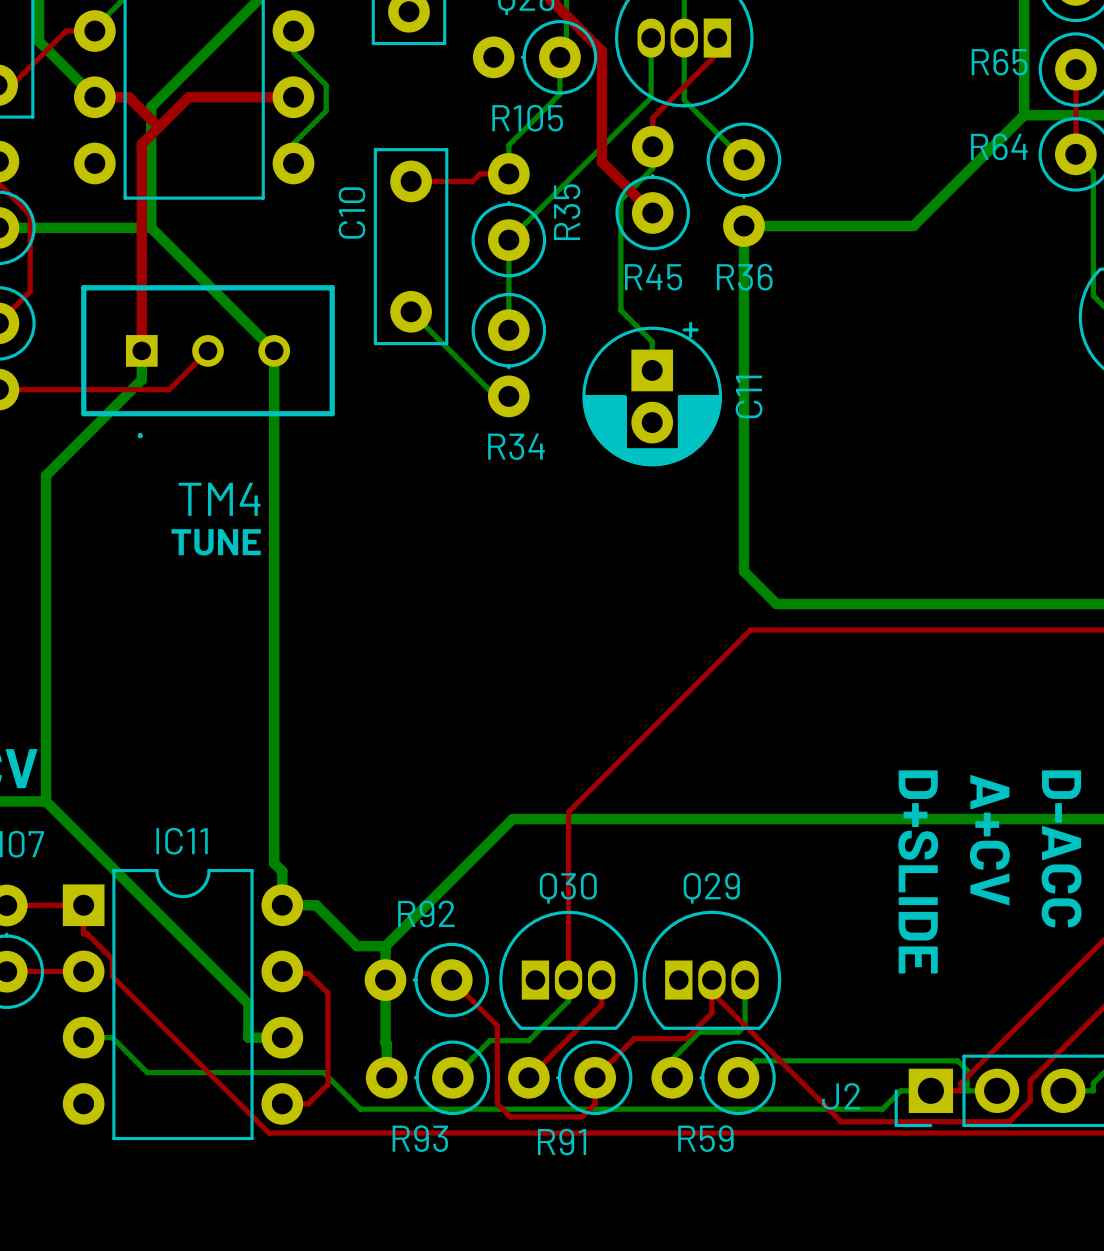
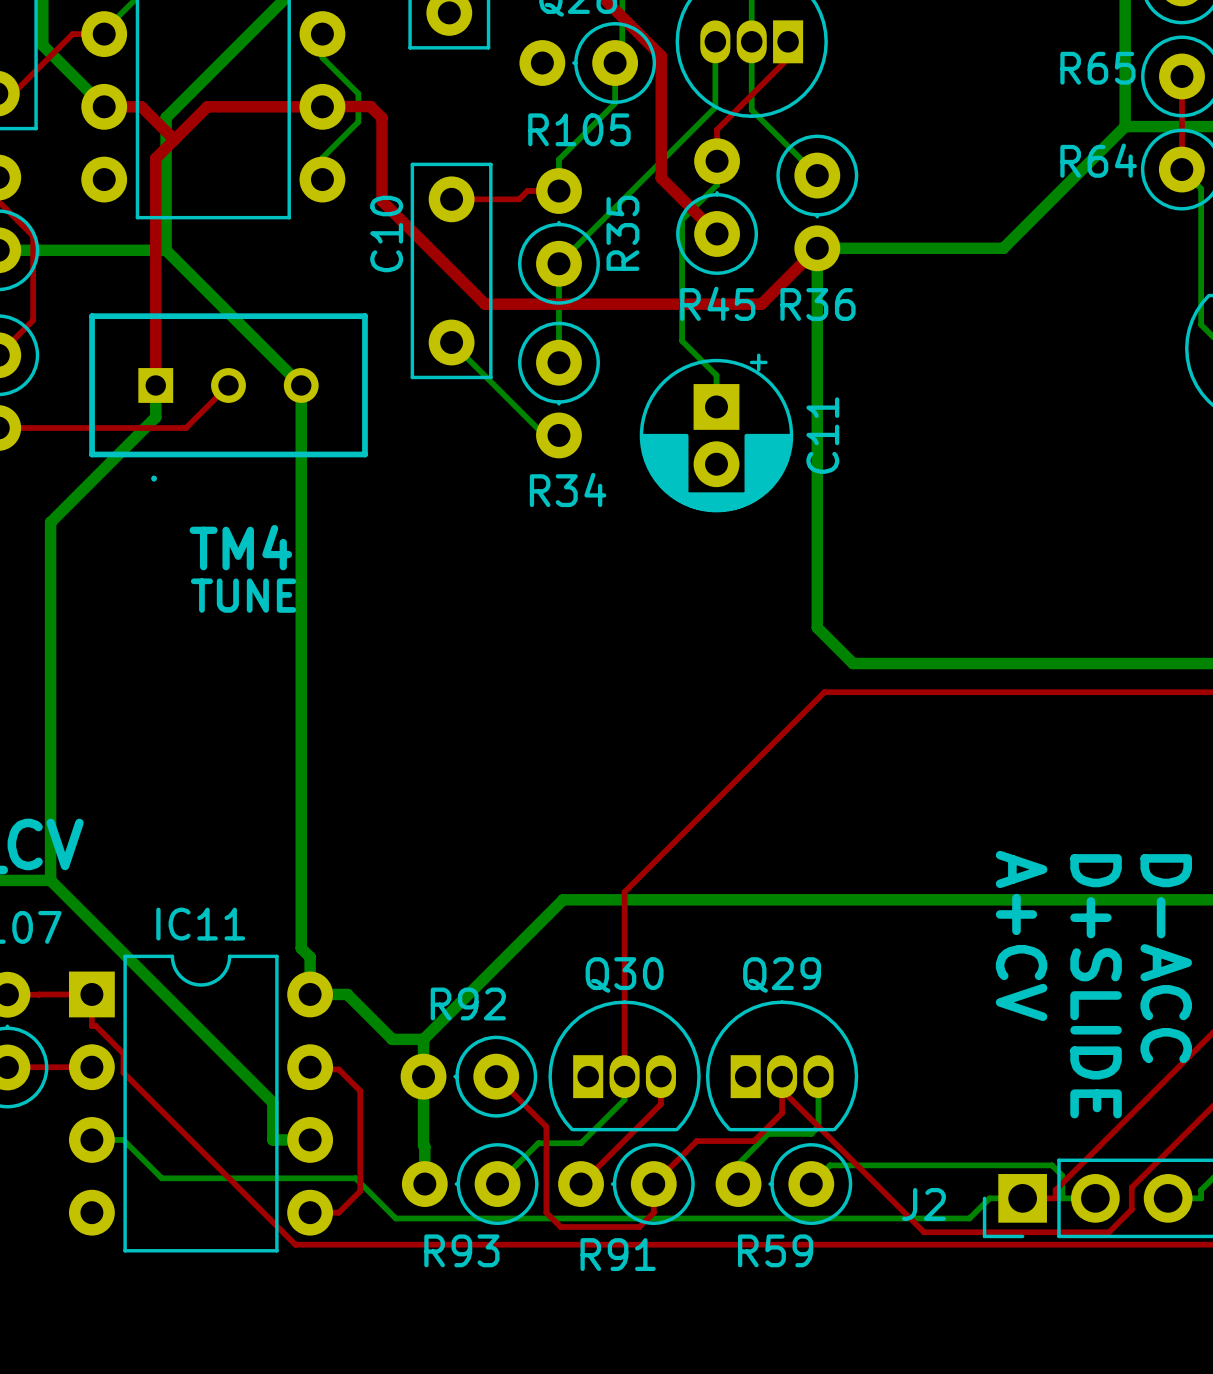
top track: none -> (322, 106) (370, 106) (382, 118) (382, 201) (485, 304) (761, 304) (817, 248)
text: A+CV (989, 840) -> D+SLIDE (1096, 986)
text: D+SLIDE (918, 871) -> A+CV (1021, 935)

